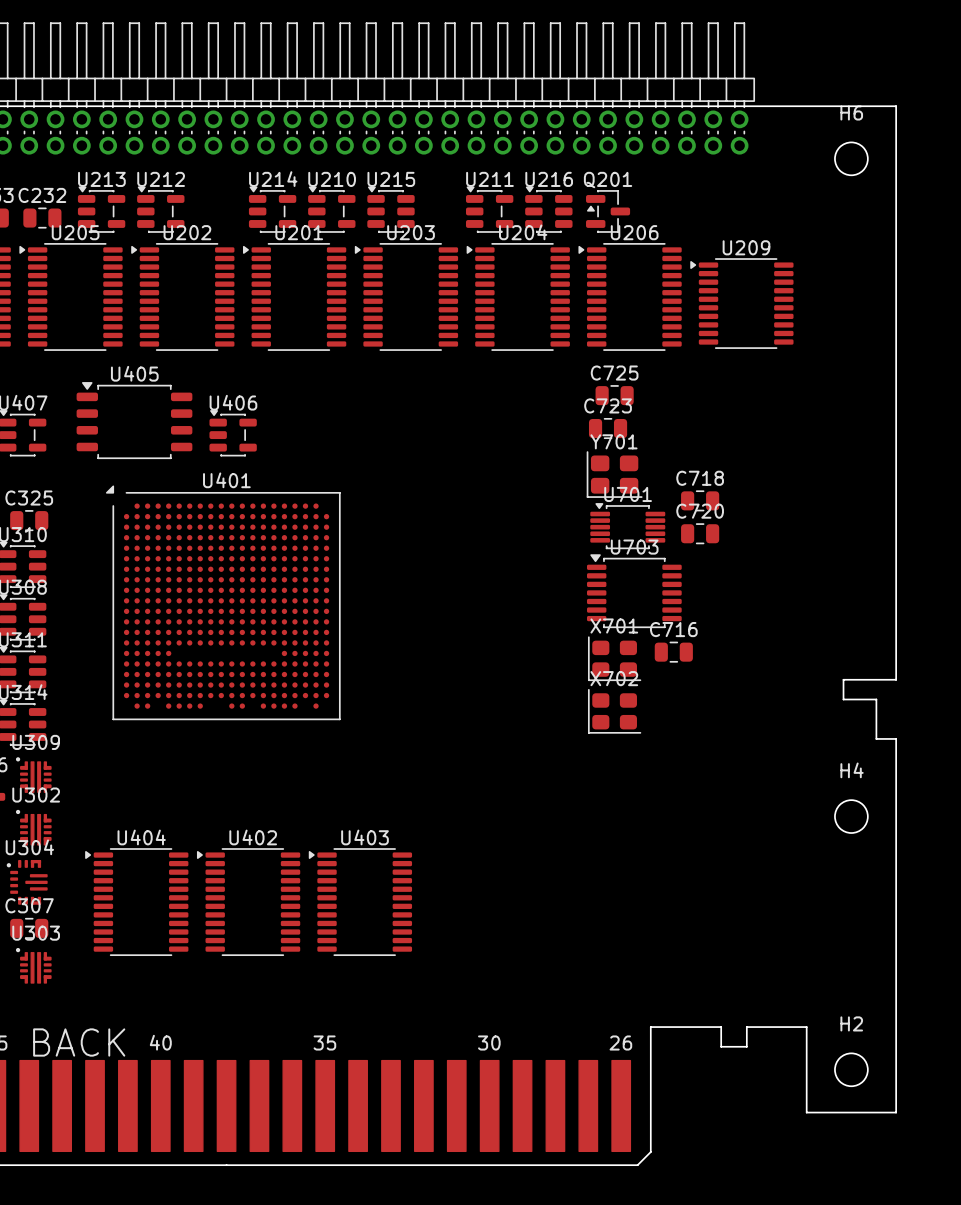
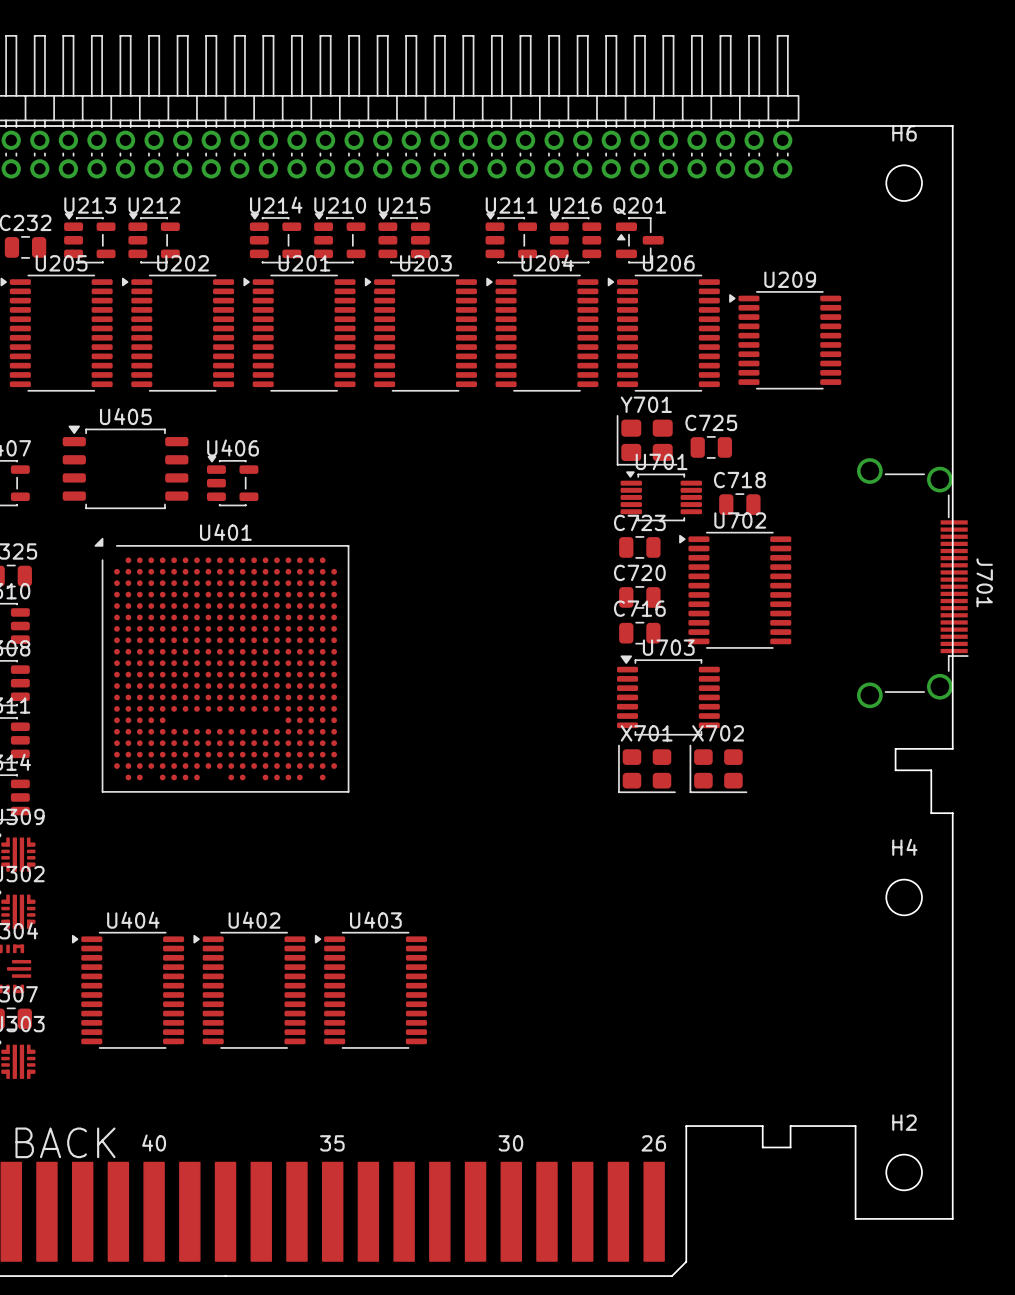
C725 position: (614, 395) -> (711, 447)
C723 position: (608, 428) -> (639, 547)
Y701 position: (614, 474) -> (646, 440)
C718 position: (700, 500) -> (739, 504)
U701 position: (627, 526) -> (661, 496)
J701: none -> (912, 583)
U702: none -> (735, 590)
C720 position: (700, 533) -> (639, 597)
U703 position: (634, 591) -> (668, 695)
C716 position: (673, 652) -> (639, 633)
X701 position: (614, 658) -> (646, 768)
X702 position: (614, 711) -> (718, 768)

